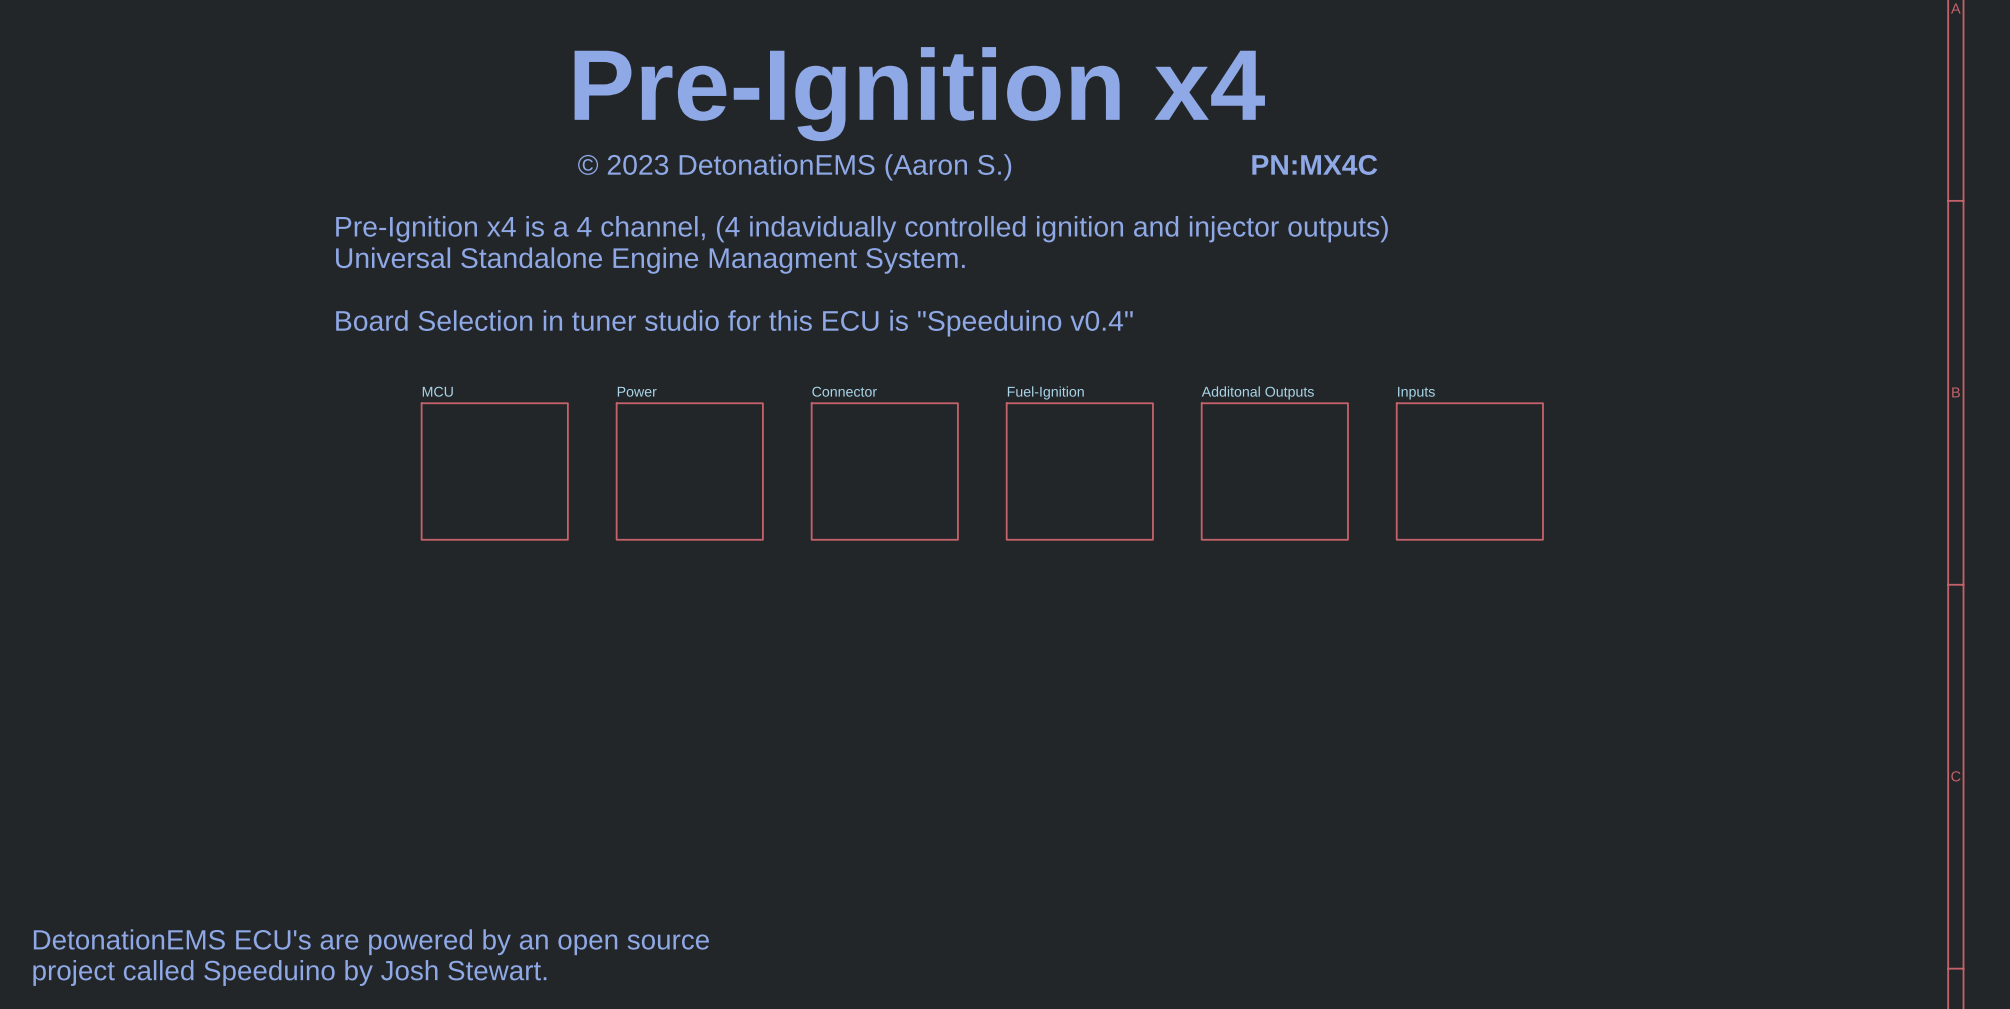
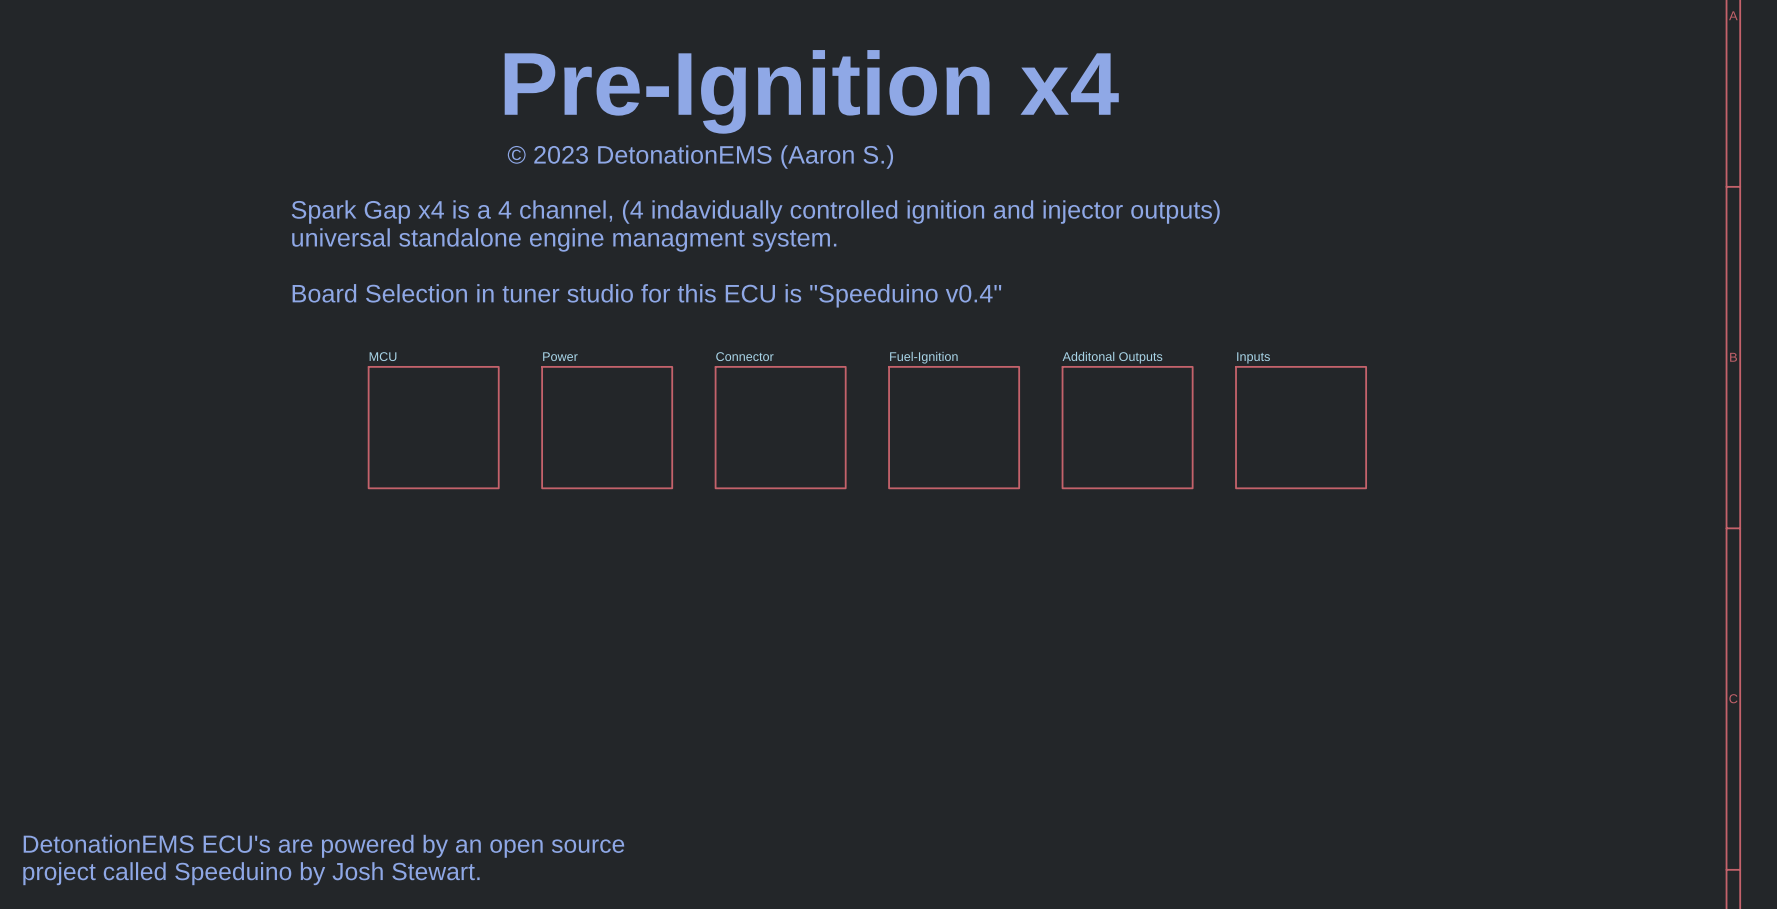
text: PN:MX4C (1314, 164) -> none
text: Pre-Ignition x4 is a 4 channel, (4 indavidually controlled ignition and injector outputs) (862, 229) -> Spark Gap x4 is a 4 channel, (4 indavidually controlled ignition and injector outputs) (755, 212)
text: Universal Standalone Engine Managment System. (650, 260) -> universal standalone engine managment system. (564, 239)

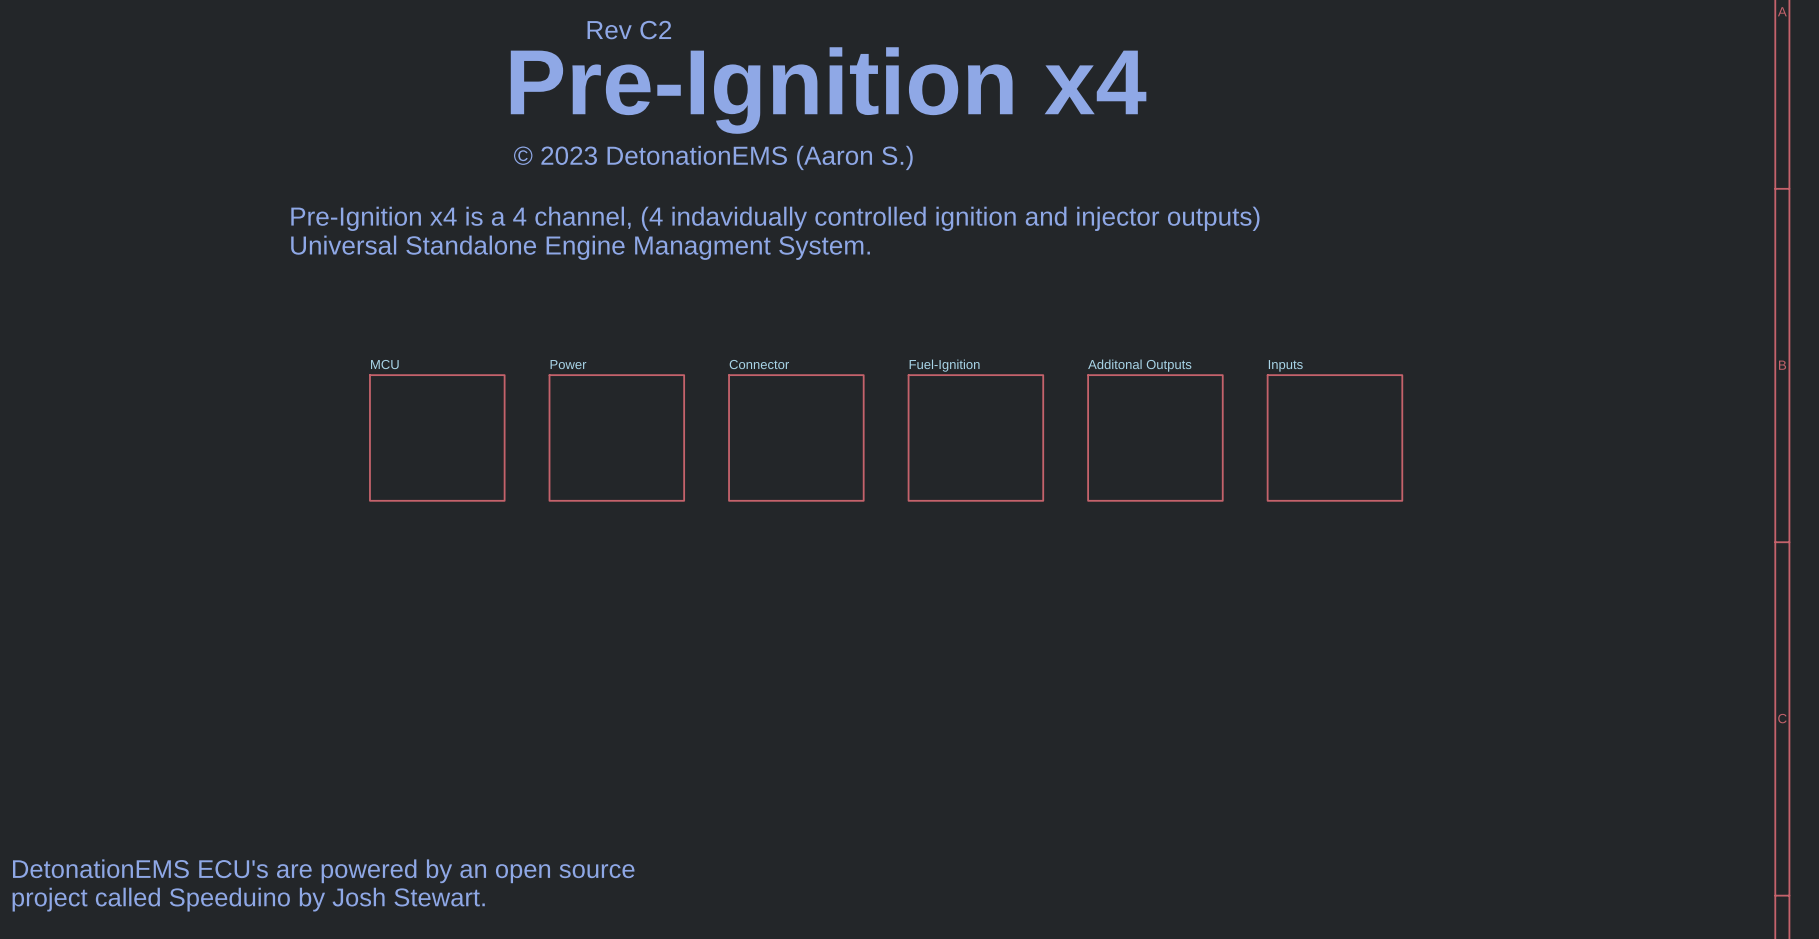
text: none -> Rev C2 (629, 30)
text: Spark Gap x4 is a 4 channel, (4 indavidually controlled ignition and injector outputs) (755, 212) -> Pre-Ignition x4 is a 4 channel, (4 indavidually controlled ignition and injector outputs) (775, 218)
text: universal standalone engine managment system. (564, 239) -> Universal Standalone Engine Managment System. (580, 247)
text: Board Selection in tuner studio for this ECU is "Speeduino v0.4" (646, 295) -> none

